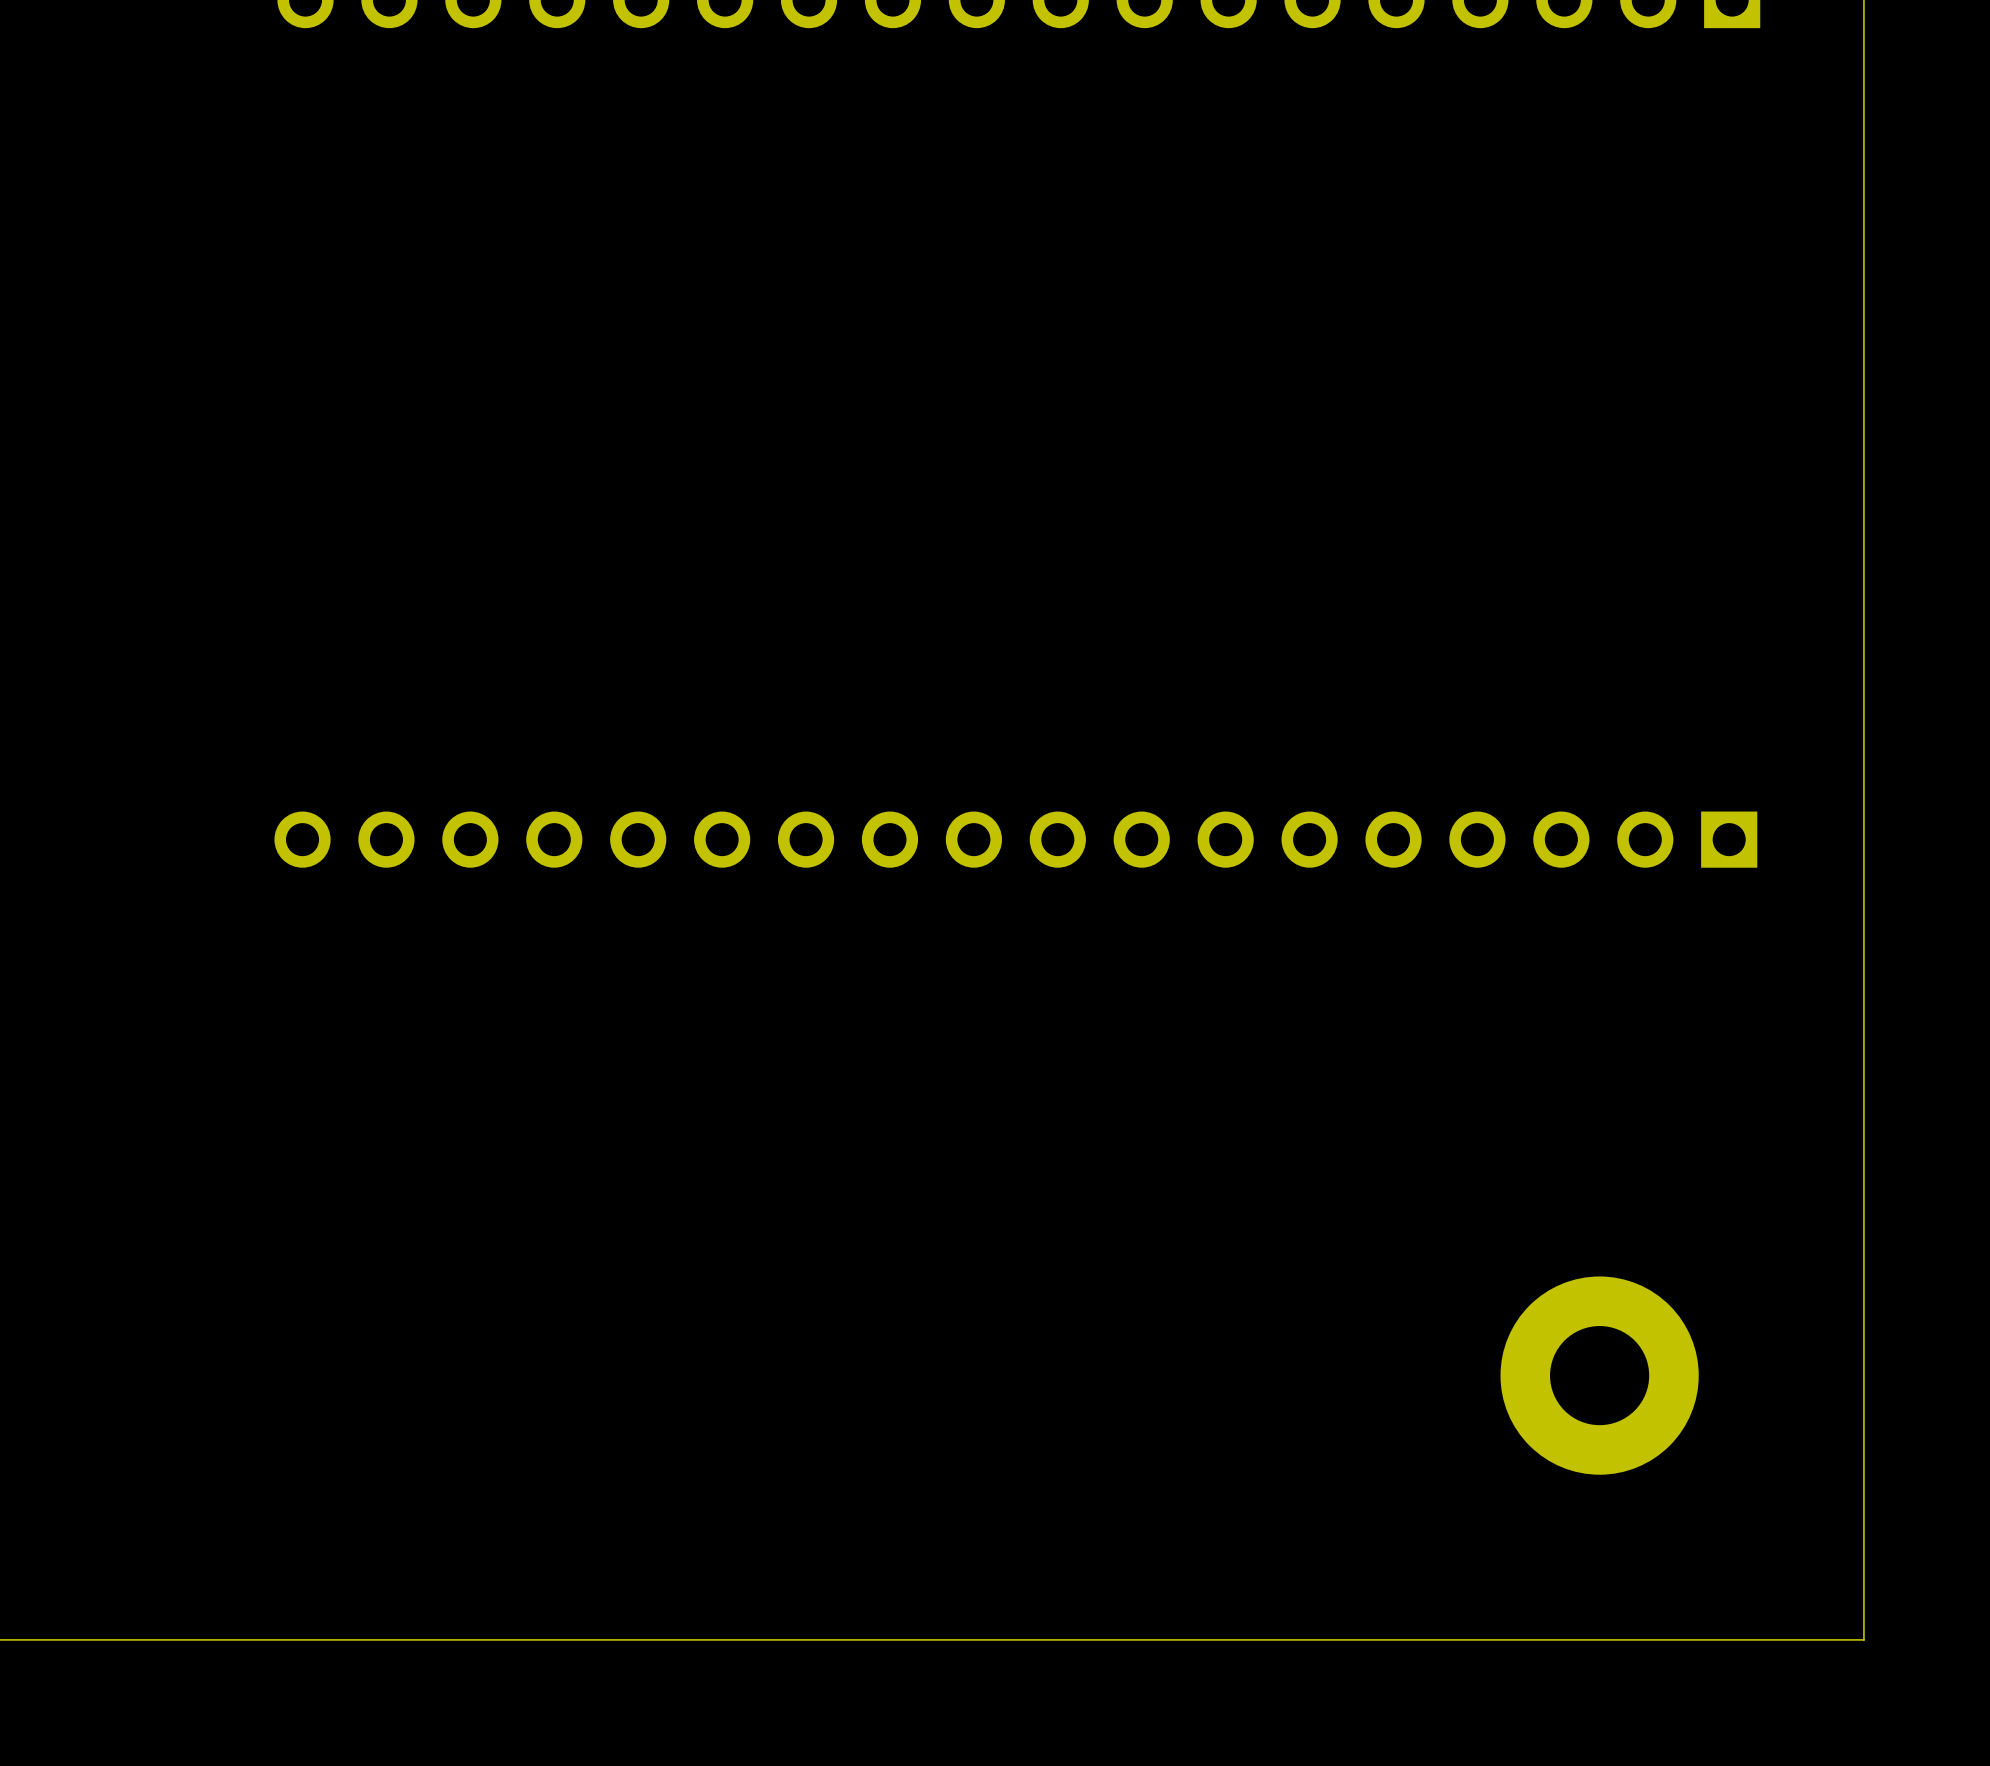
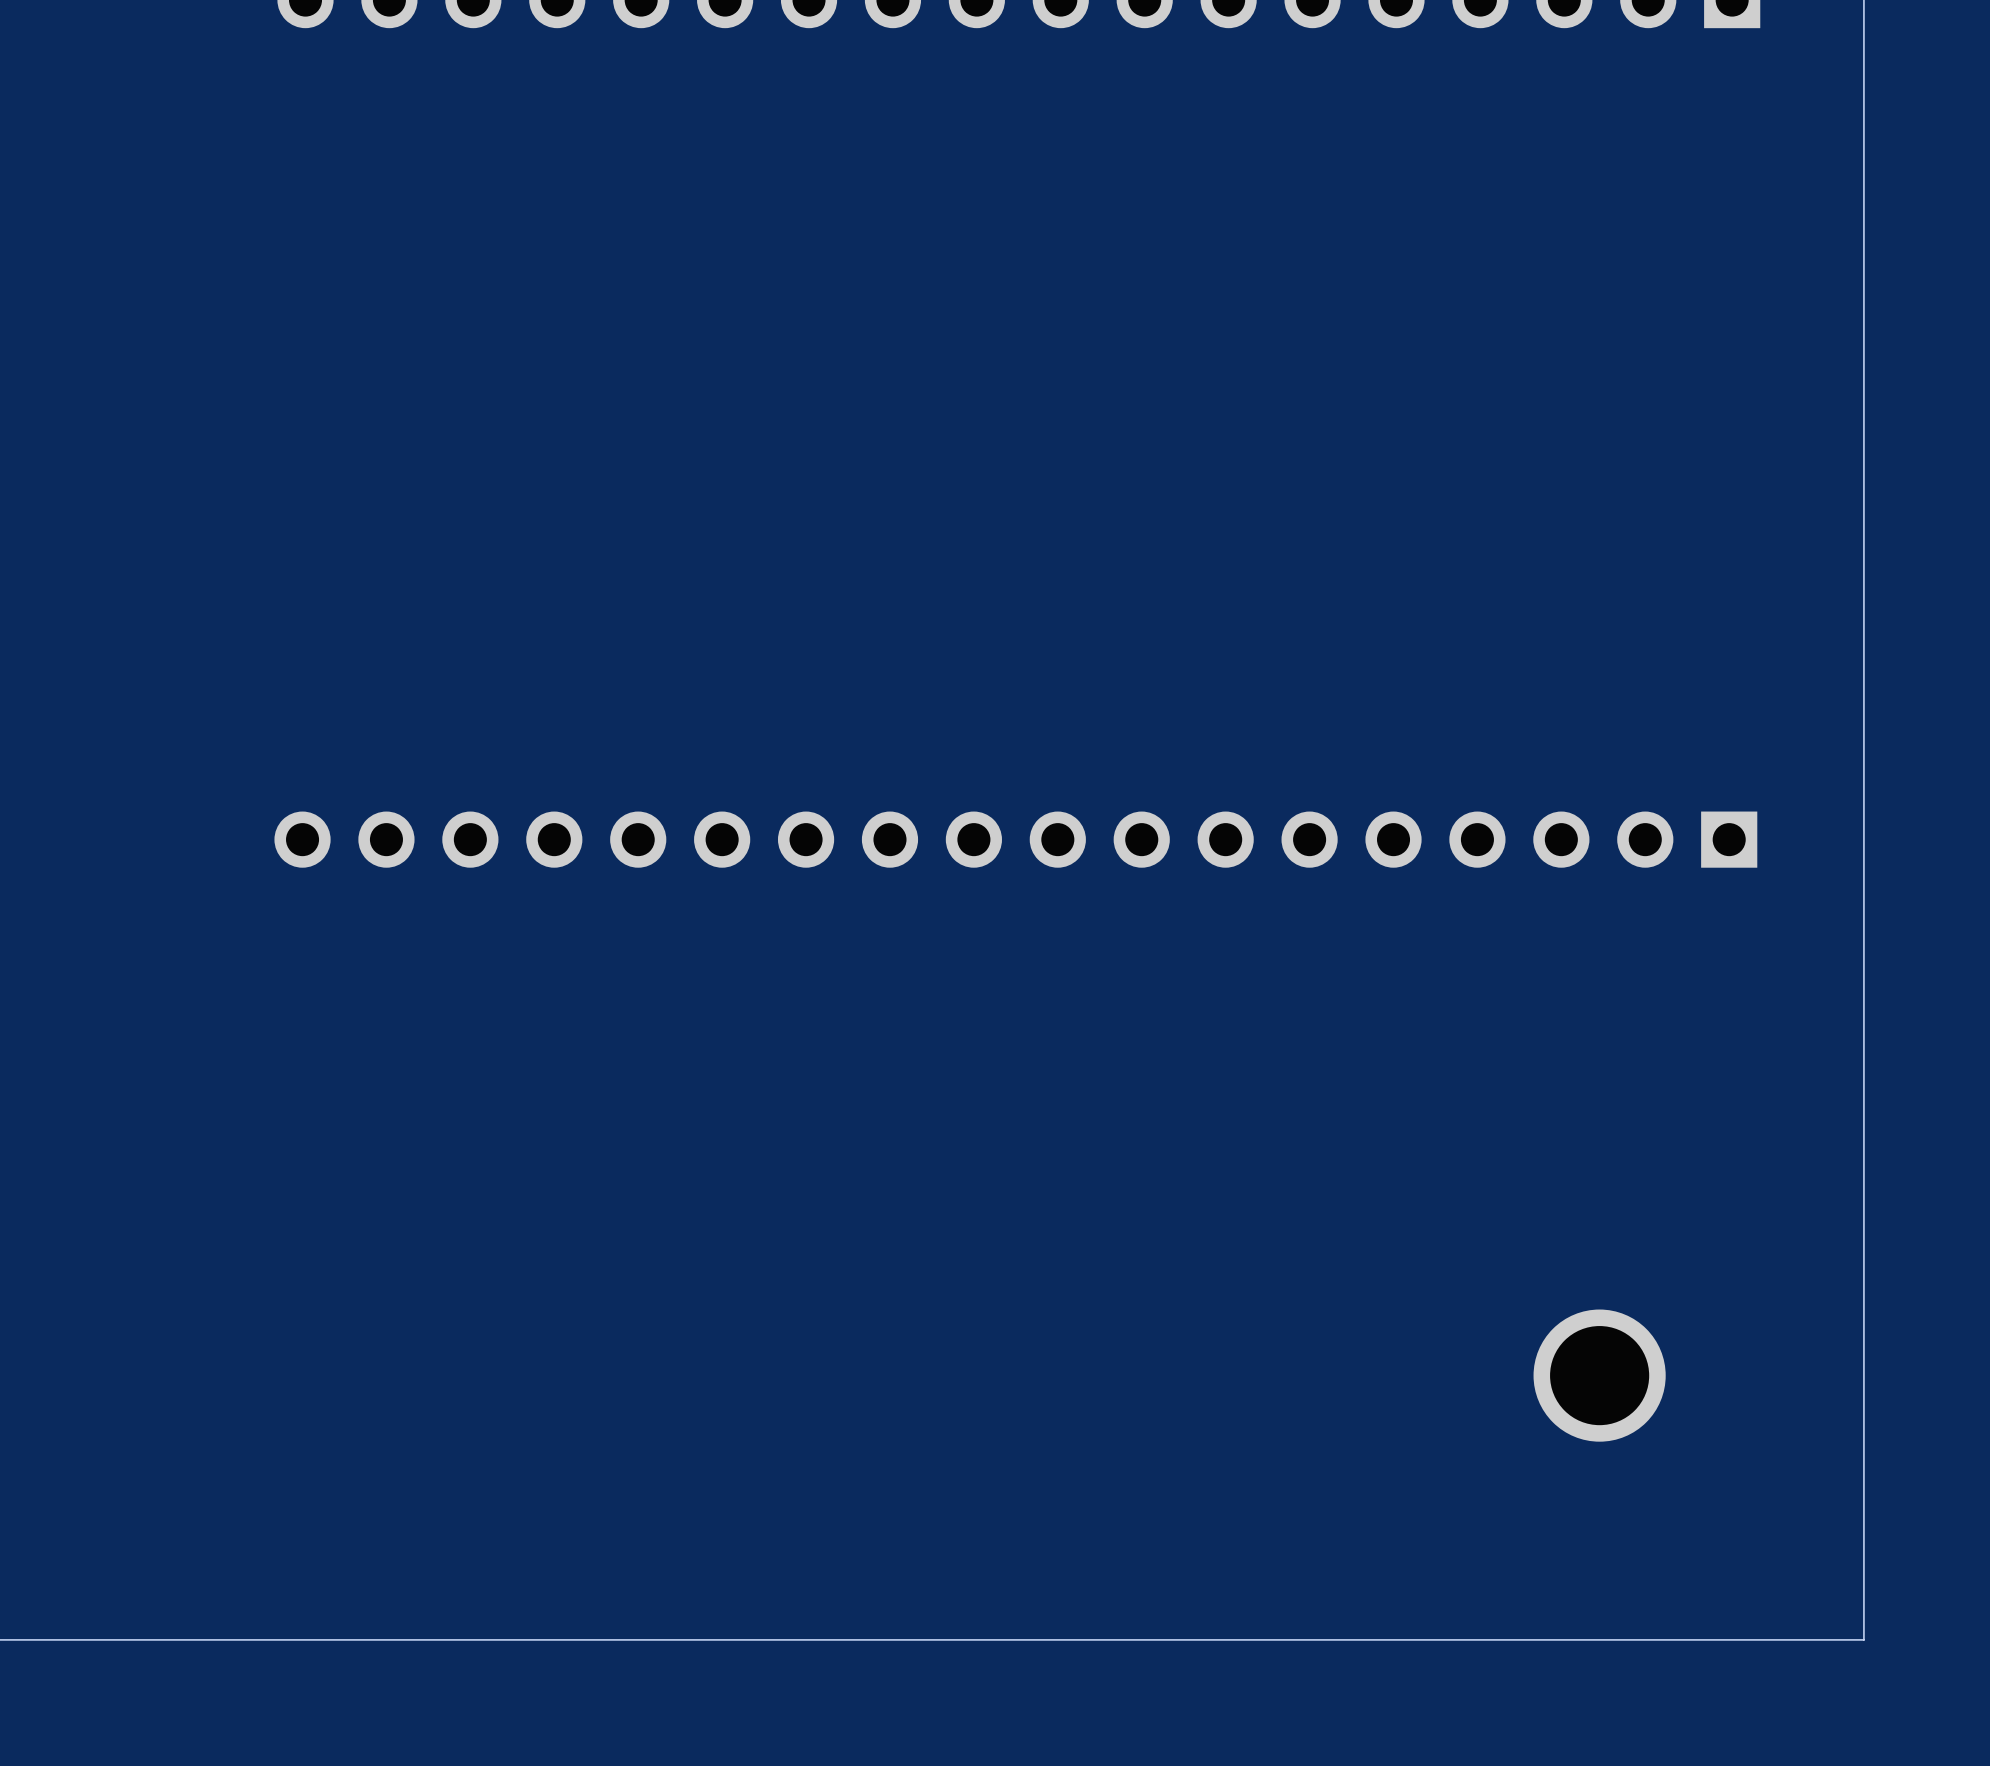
part footprint: [1500, 1276, 1699, 1475] -> [1533, 1309, 1666, 1442]

